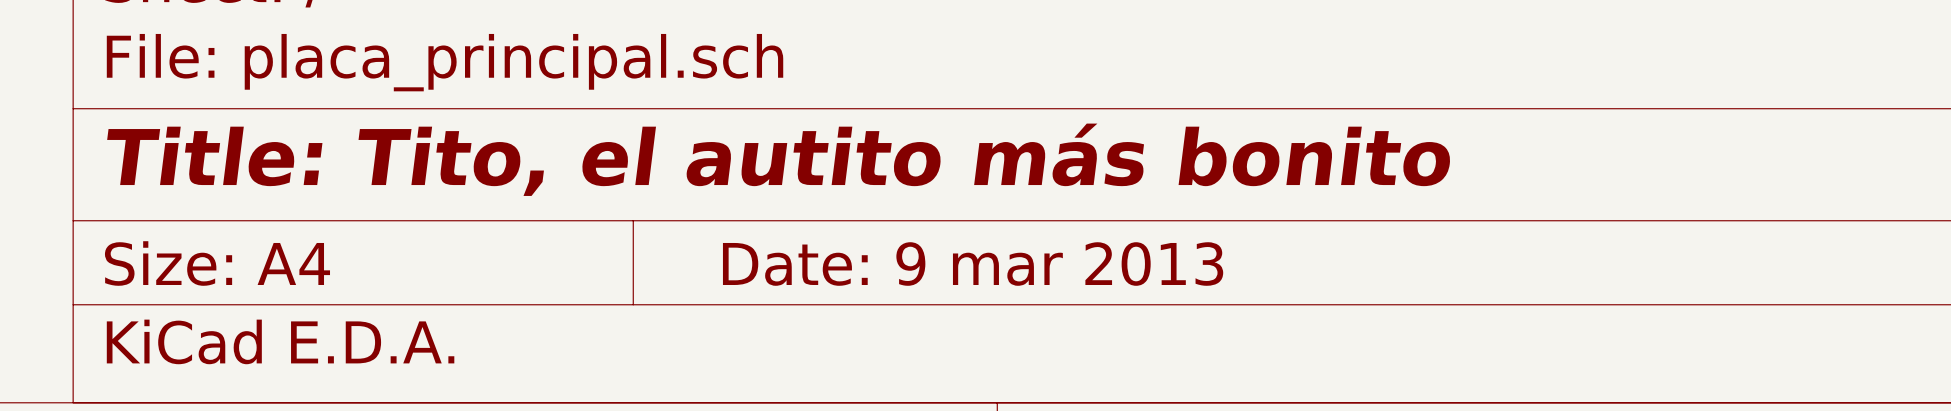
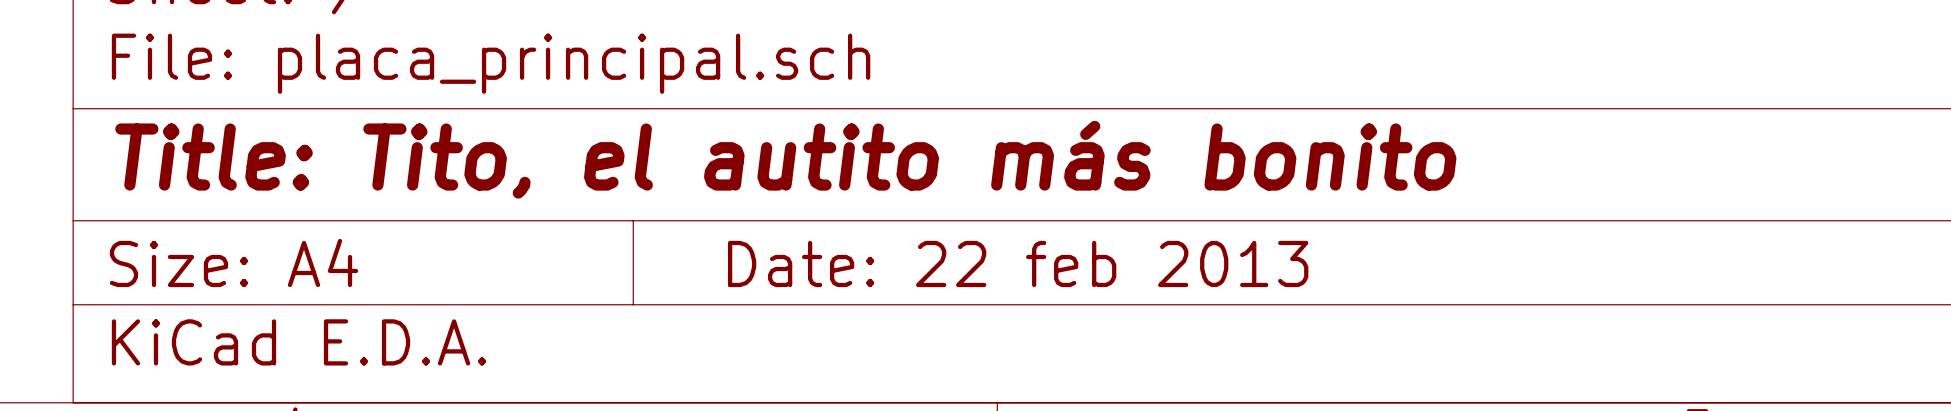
title block: Date: 9 mar 2013 (973, 264) -> Date: 22 feb 2013 (1018, 263)

